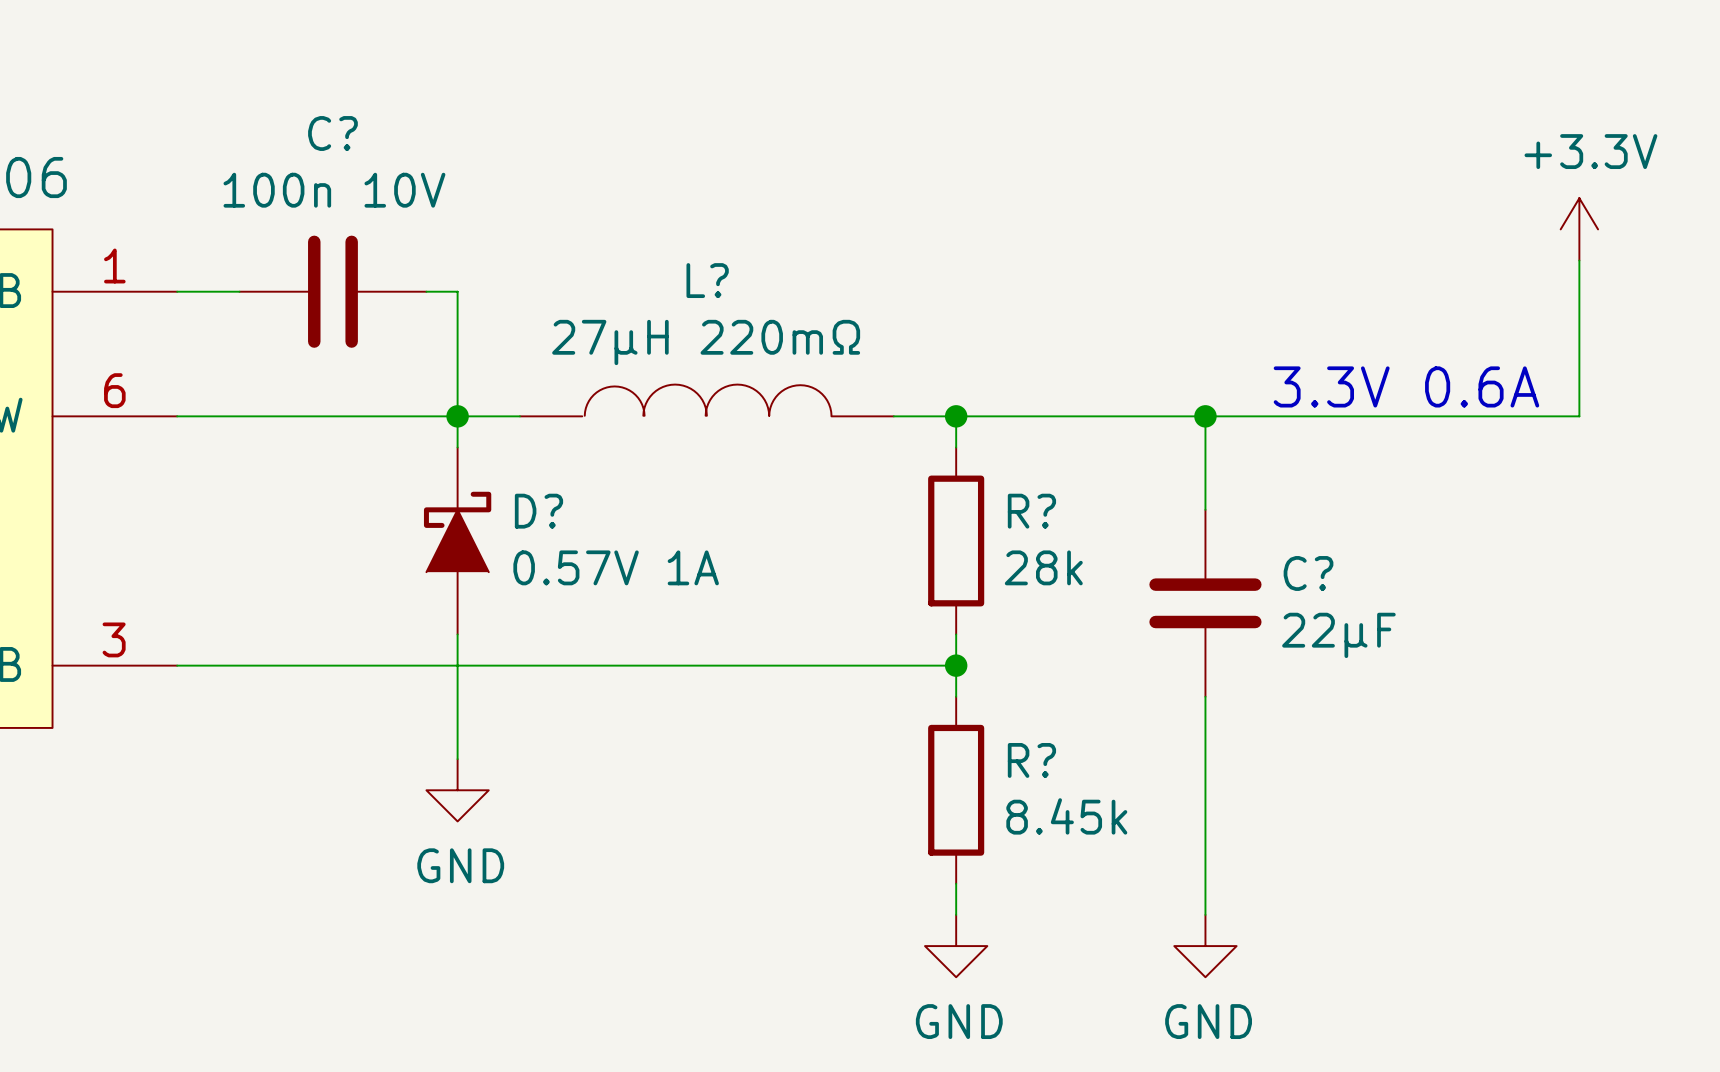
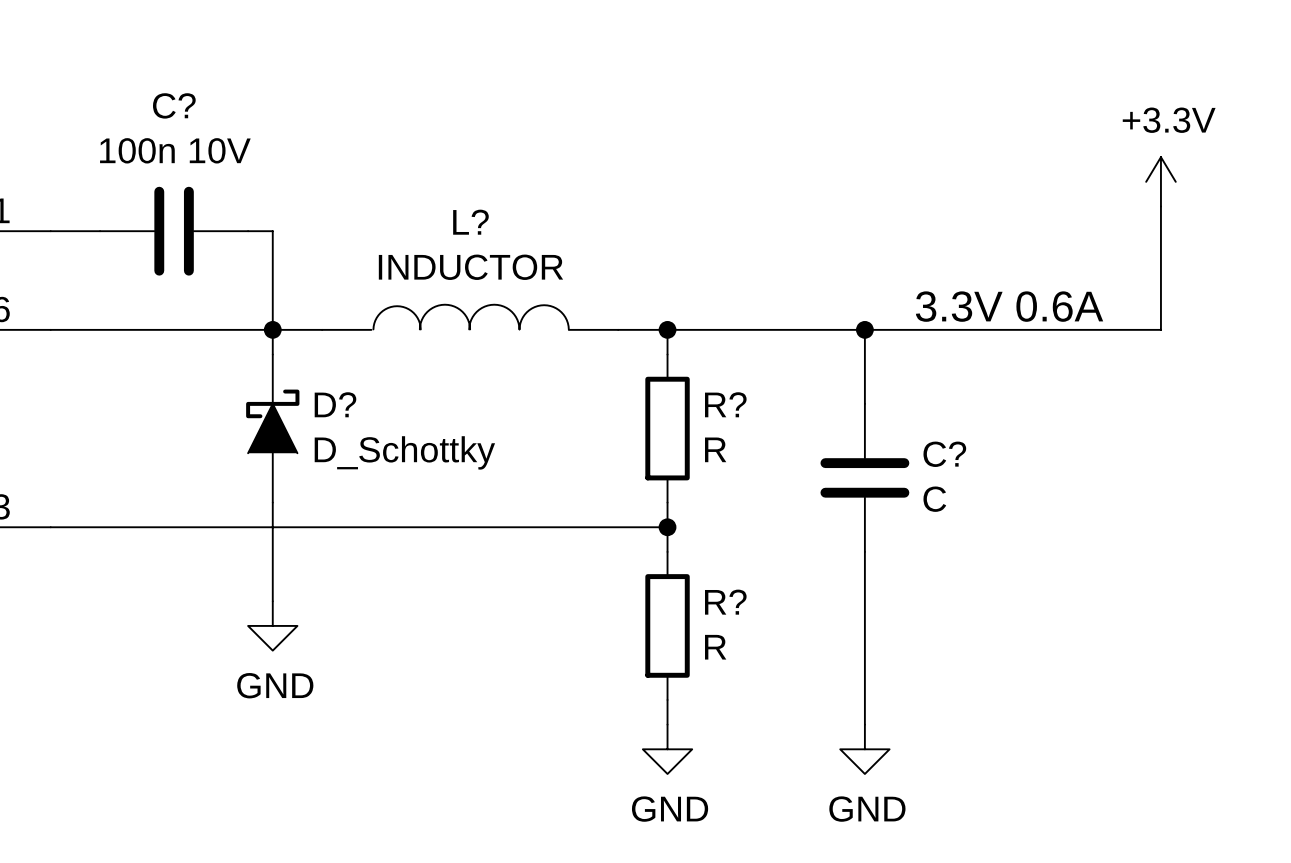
L? value: 27µH 220mΩ (706, 342) -> INDUCTOR (470, 267)
D? value: 0.57V 1A (616, 567) -> D_Schottky (404, 452)
R? value: 28k (1043, 567) -> R (715, 449)
C? value: 22µF (1338, 635) -> C (934, 499)
R? value: 8.45k (1066, 816) -> R (715, 647)

